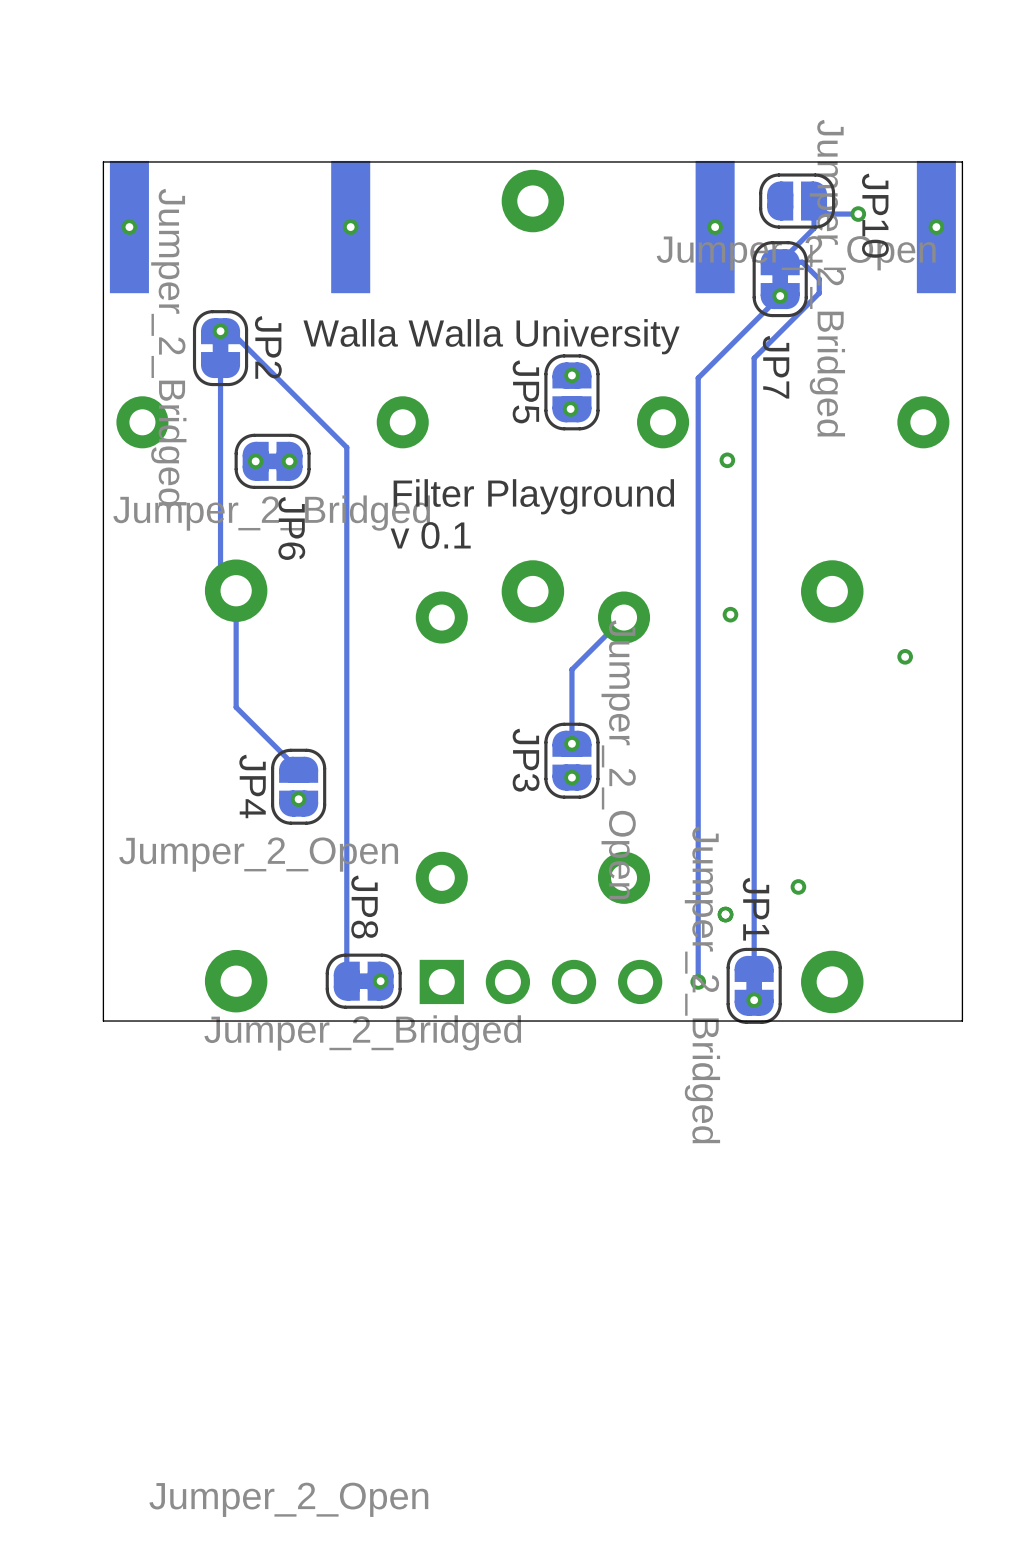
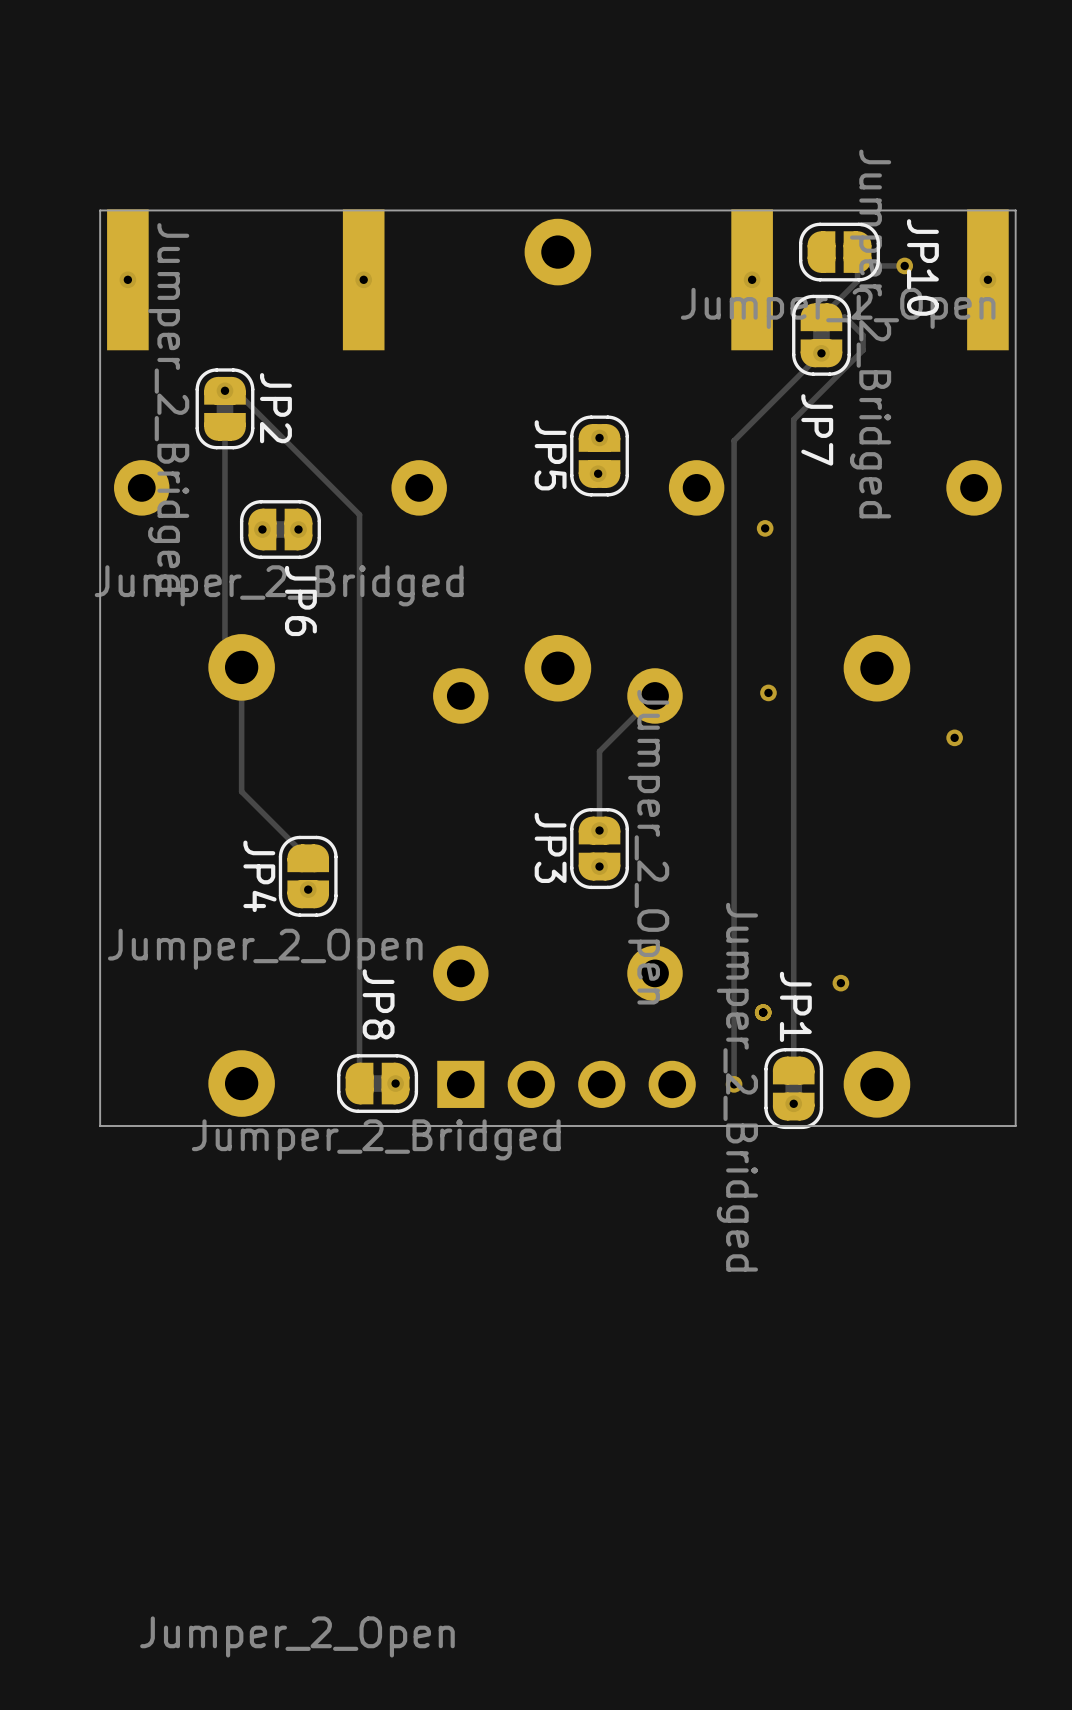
text: Walla Walla University (491, 336) -> none
text: Filter Playground (533, 496) -> none
text: v 0.1 (430, 535) -> none

